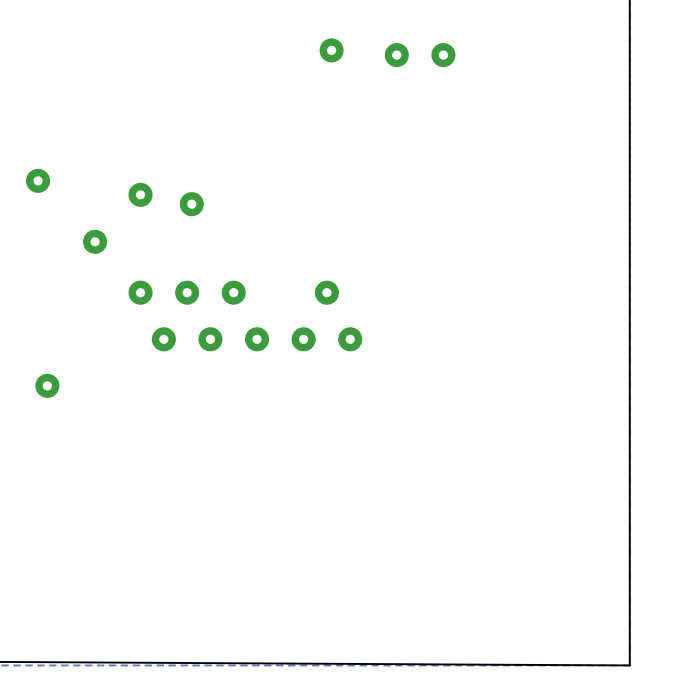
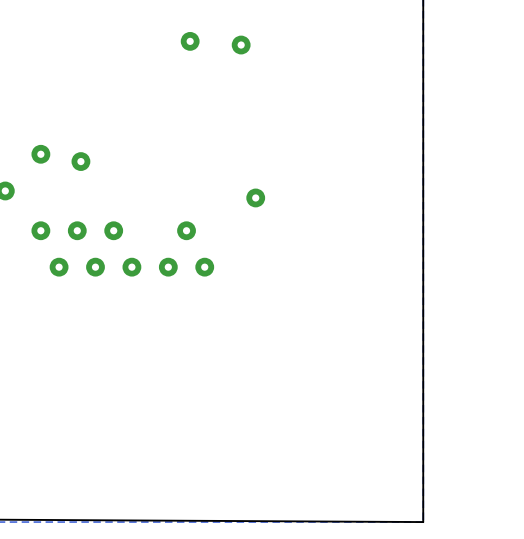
via: (443, 55) -> none
via: none -> (255, 197)

